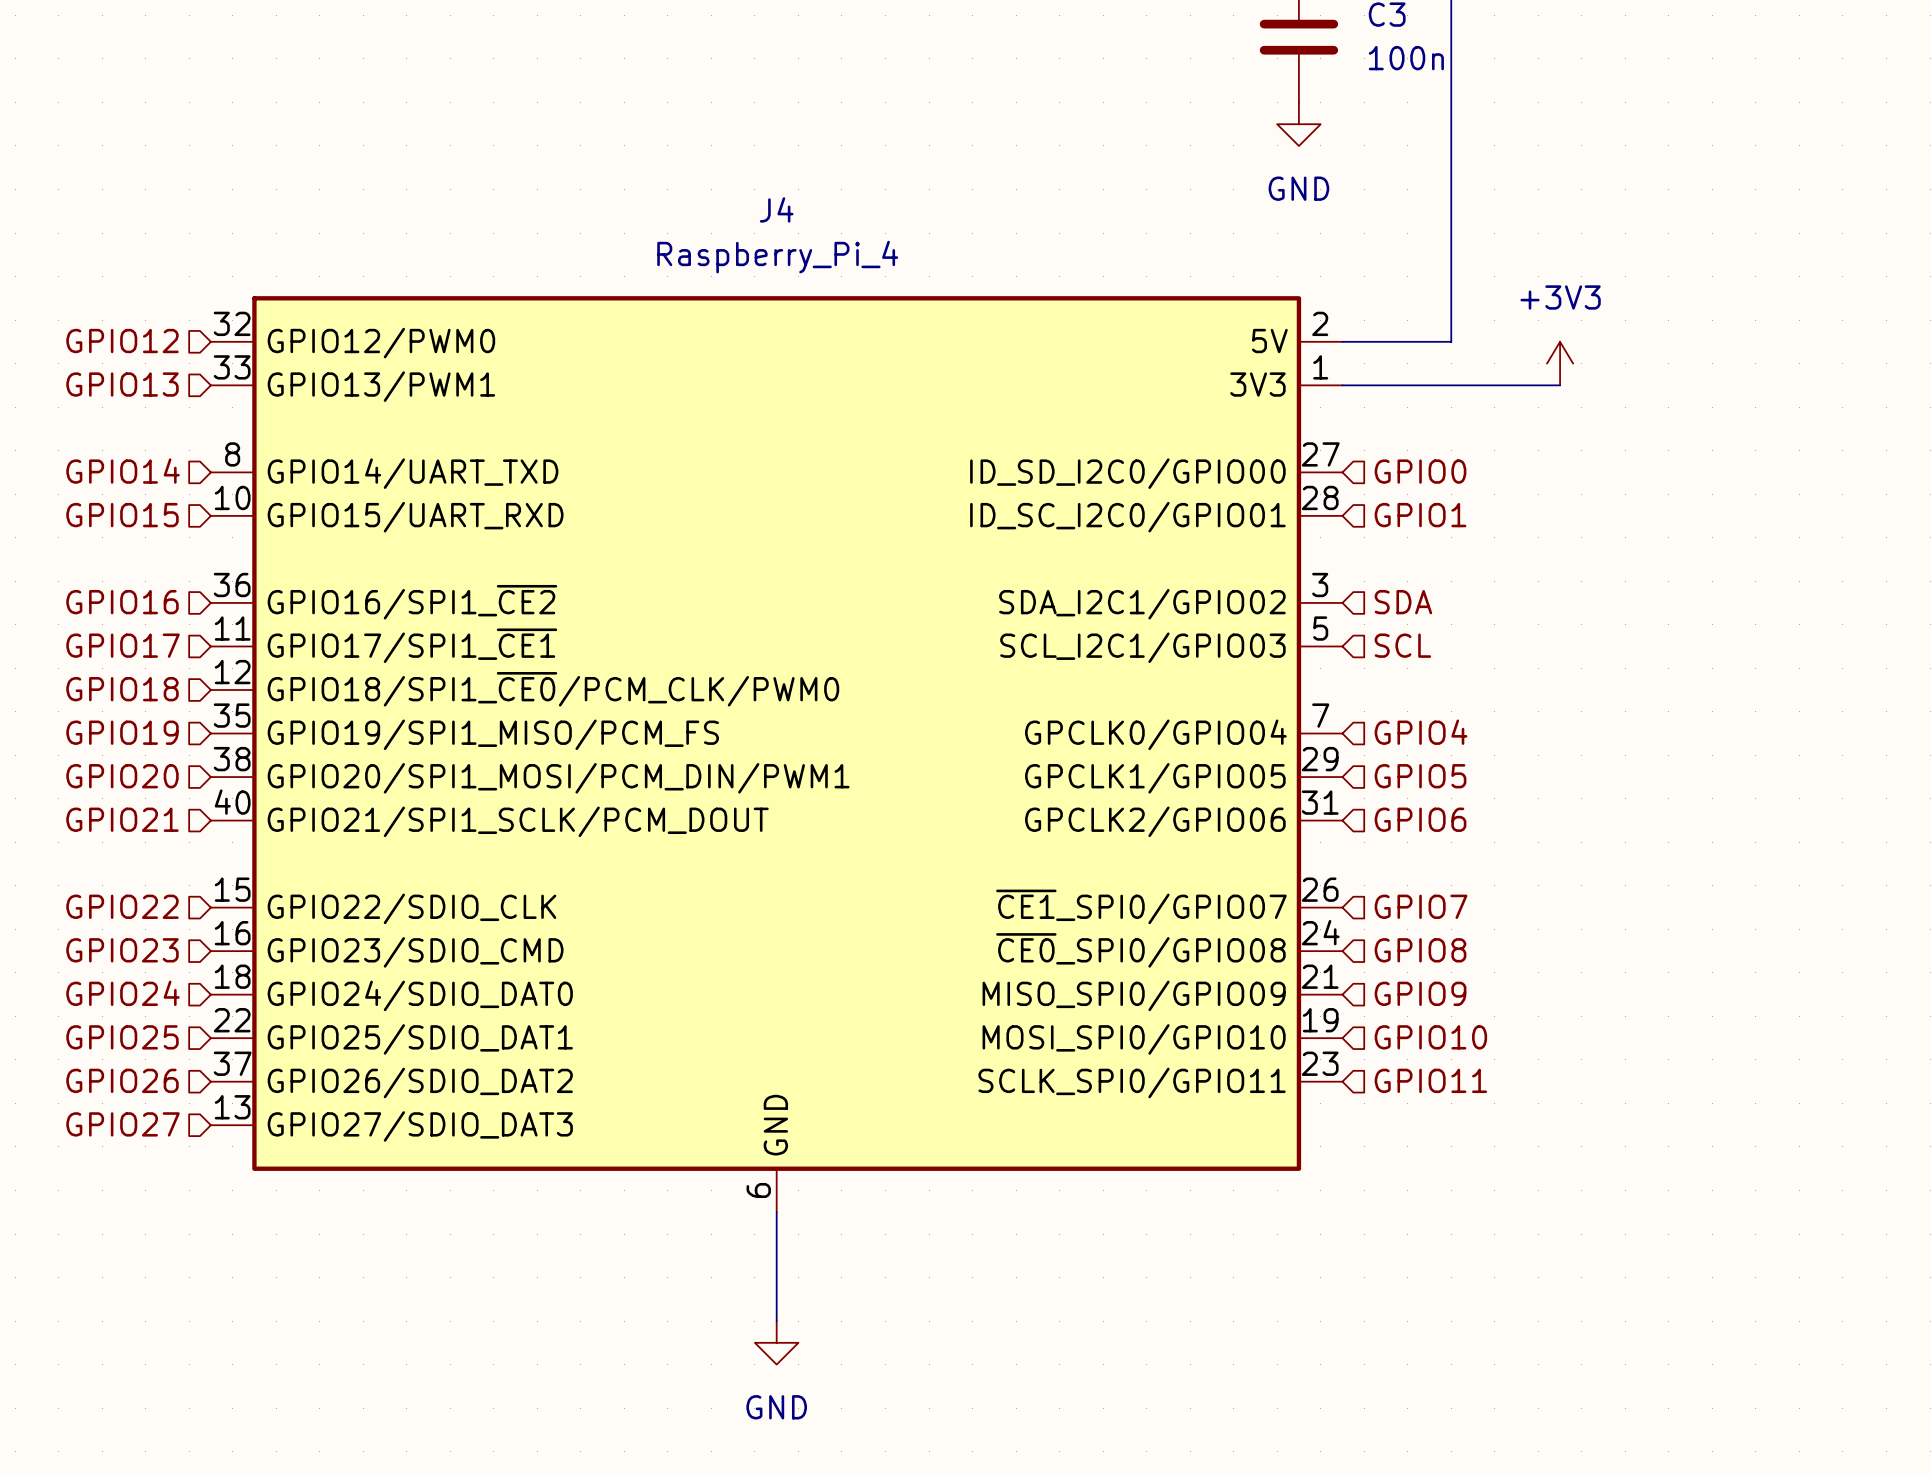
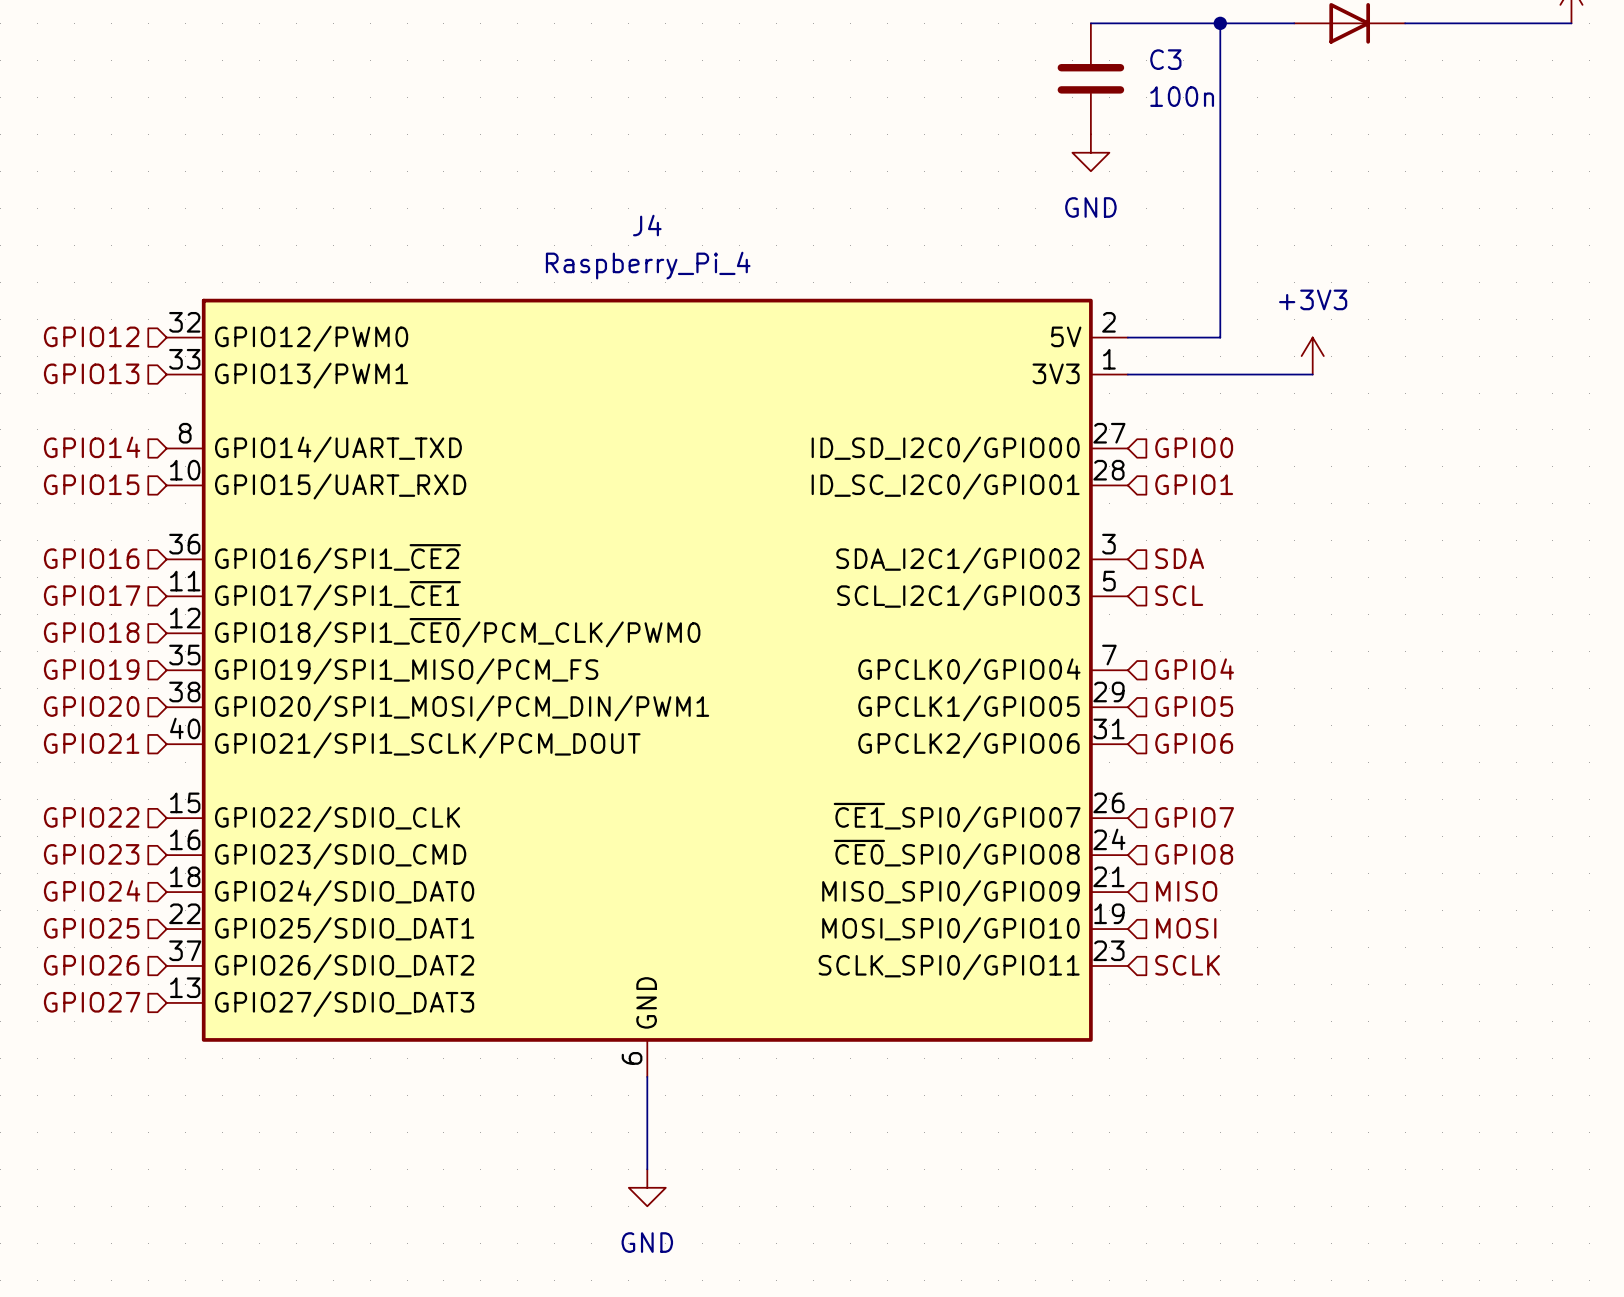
hierarchical label: GPIO9 (1420, 993) -> MISO (1186, 891)
hierarchical label: GPIO10 (1430, 1037) -> MOSI (1186, 928)
hierarchical label: GPIO11 (1430, 1080) -> SCLK (1187, 965)

